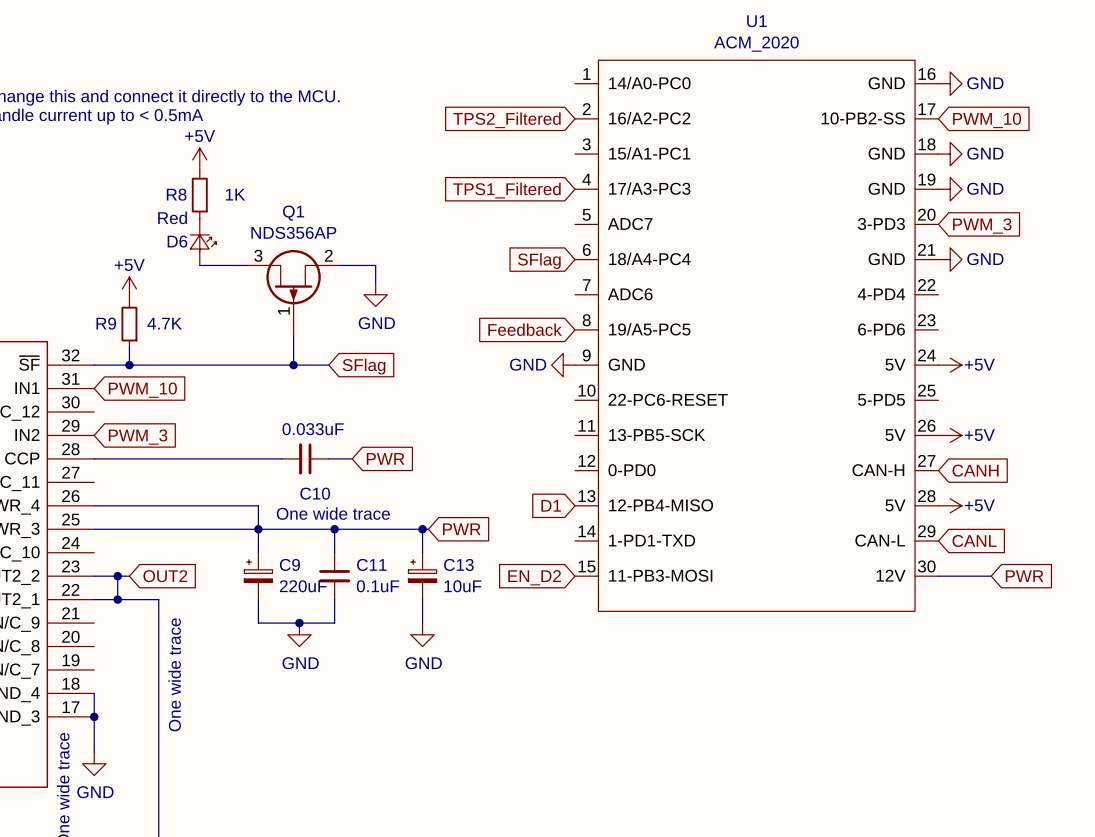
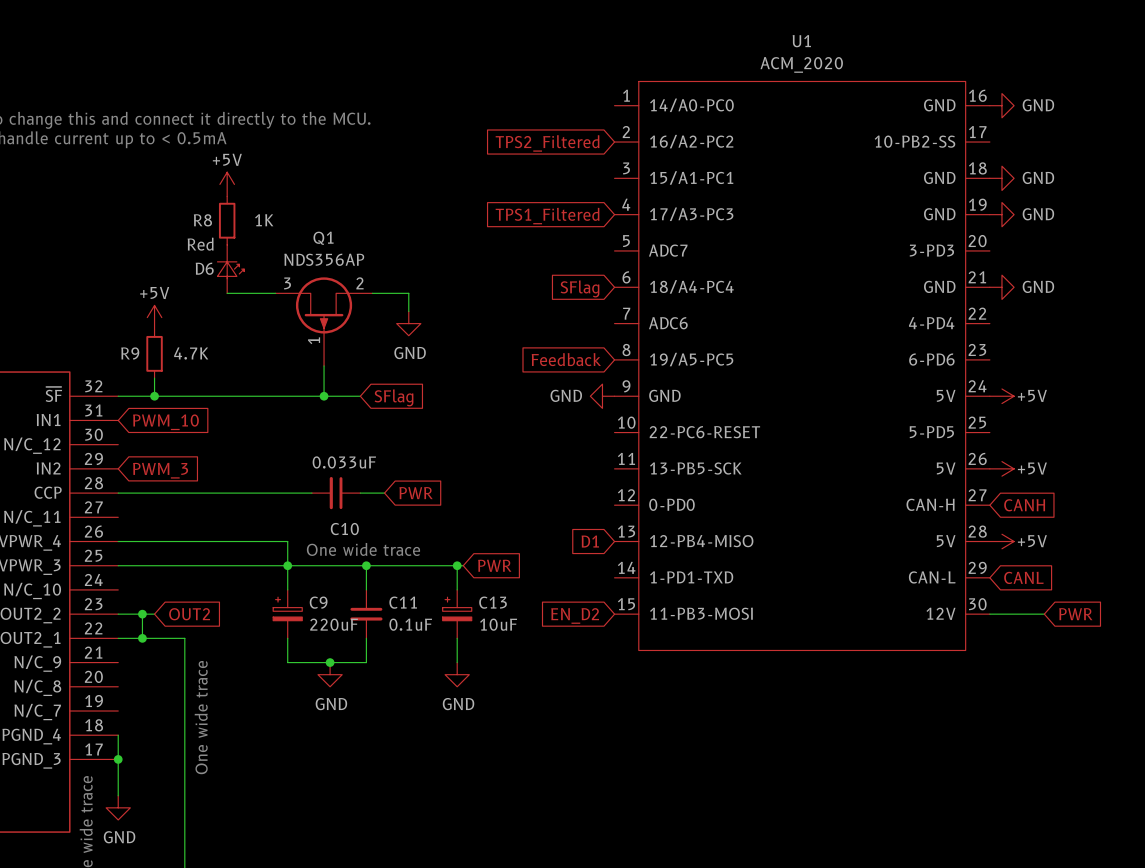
global label: PWM_10 (987, 120) -> none
global label: PWM_3 (982, 226) -> none

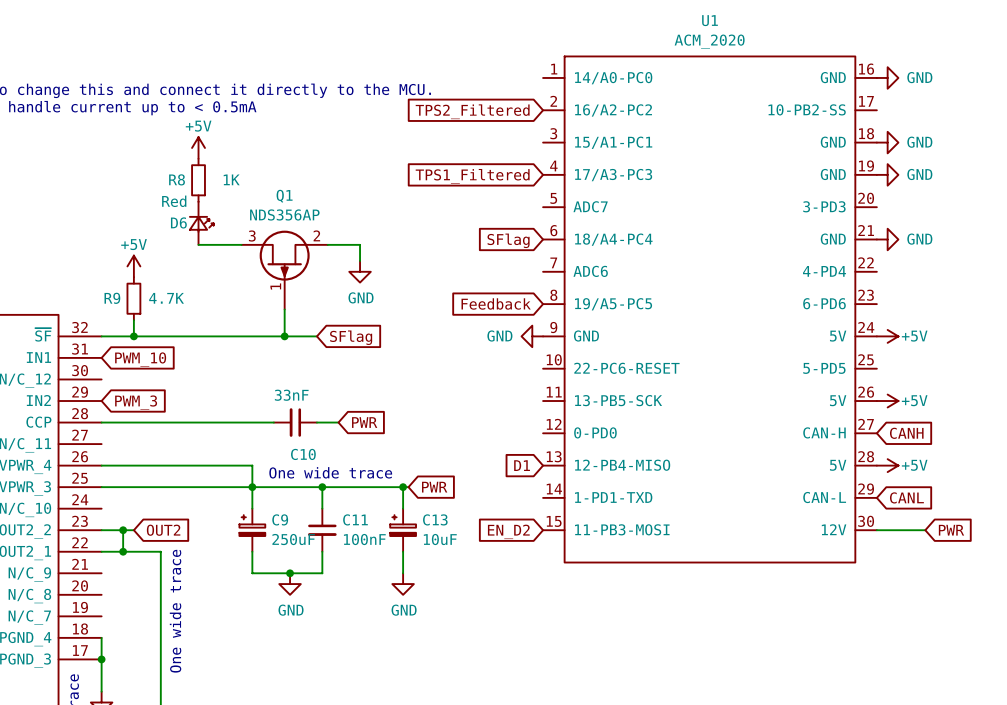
C10 value: 0.033uF (344, 462) -> 33nF (291, 395)
C9 value: 220uF (334, 624) -> 250uF (293, 539)
C11 value: 0.1uF (410, 624) -> 100nF (364, 539)

